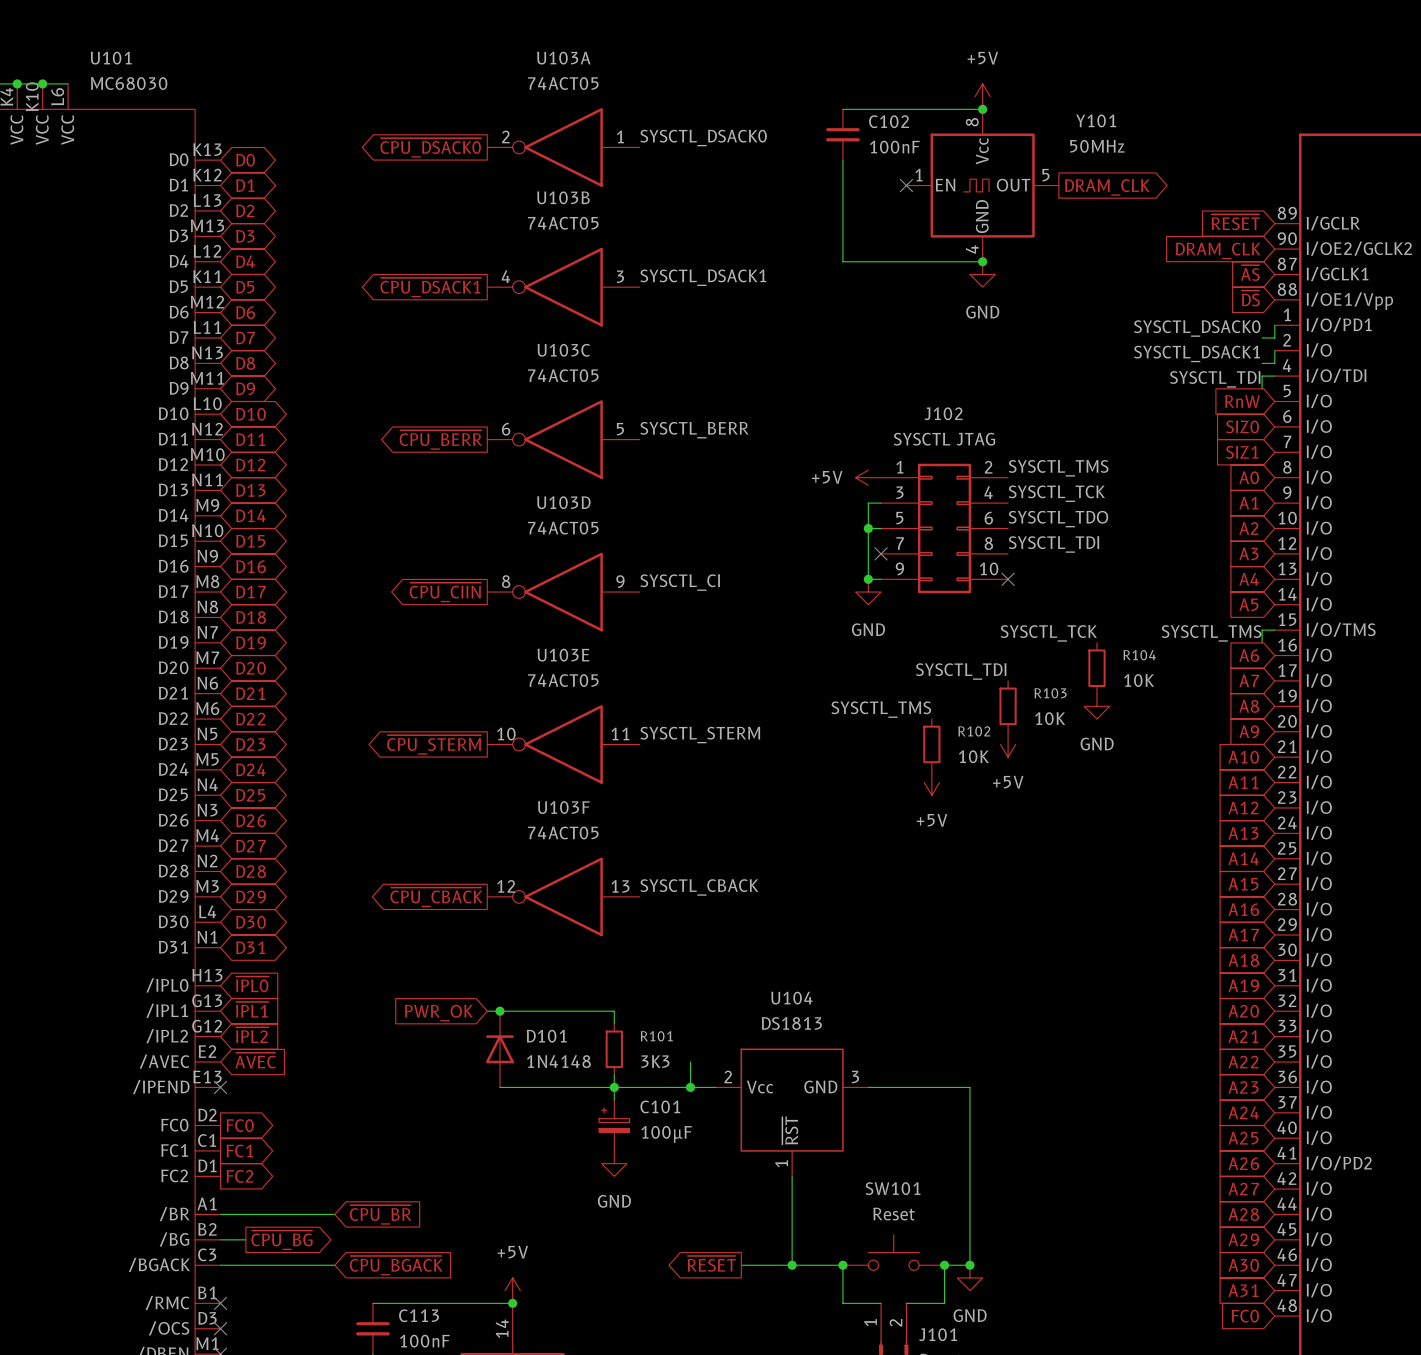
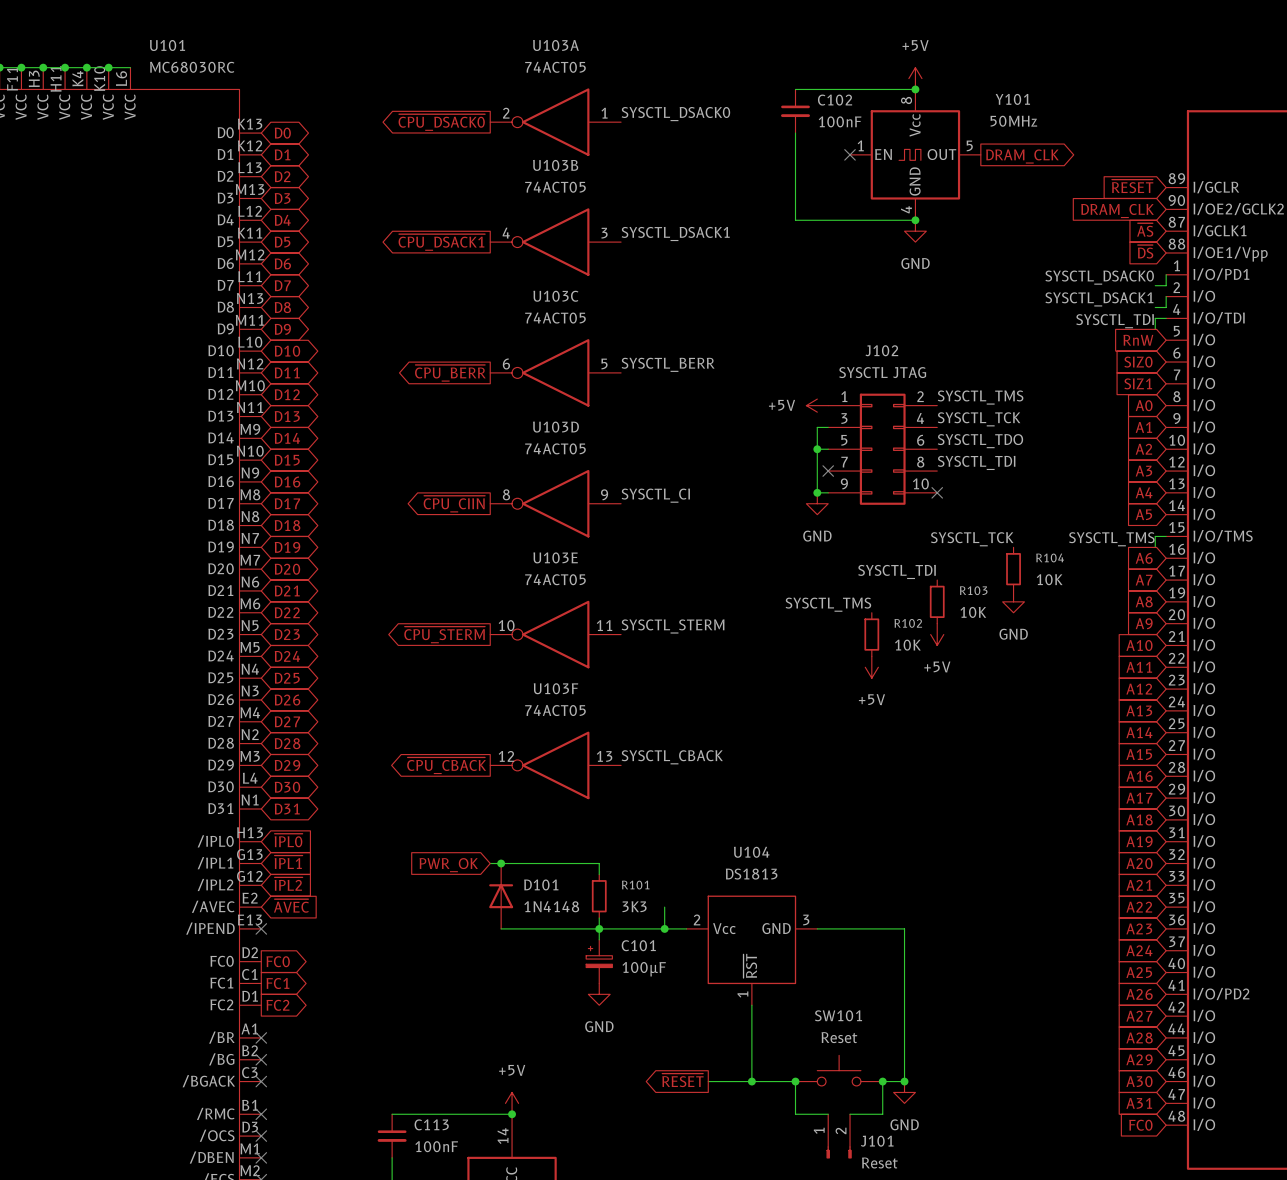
U101 value: MC68030 (129, 83) -> MC68030RC (192, 67)
wire: (220, 1214) (334, 1214) -> none
no-connect mark: none -> (261, 1037)
global label: ~{CPU_BR} (380, 1214) -> none
wire: (220, 1239) (245, 1239) -> none
no-connect mark: none -> (261, 1059)
global label: ~{CPU_BG} (281, 1240) -> none
wire: (220, 1265) (334, 1265) -> none
no-connect mark: none -> (261, 1081)
global label: ~{CPU_BGACK} (396, 1265) -> none

